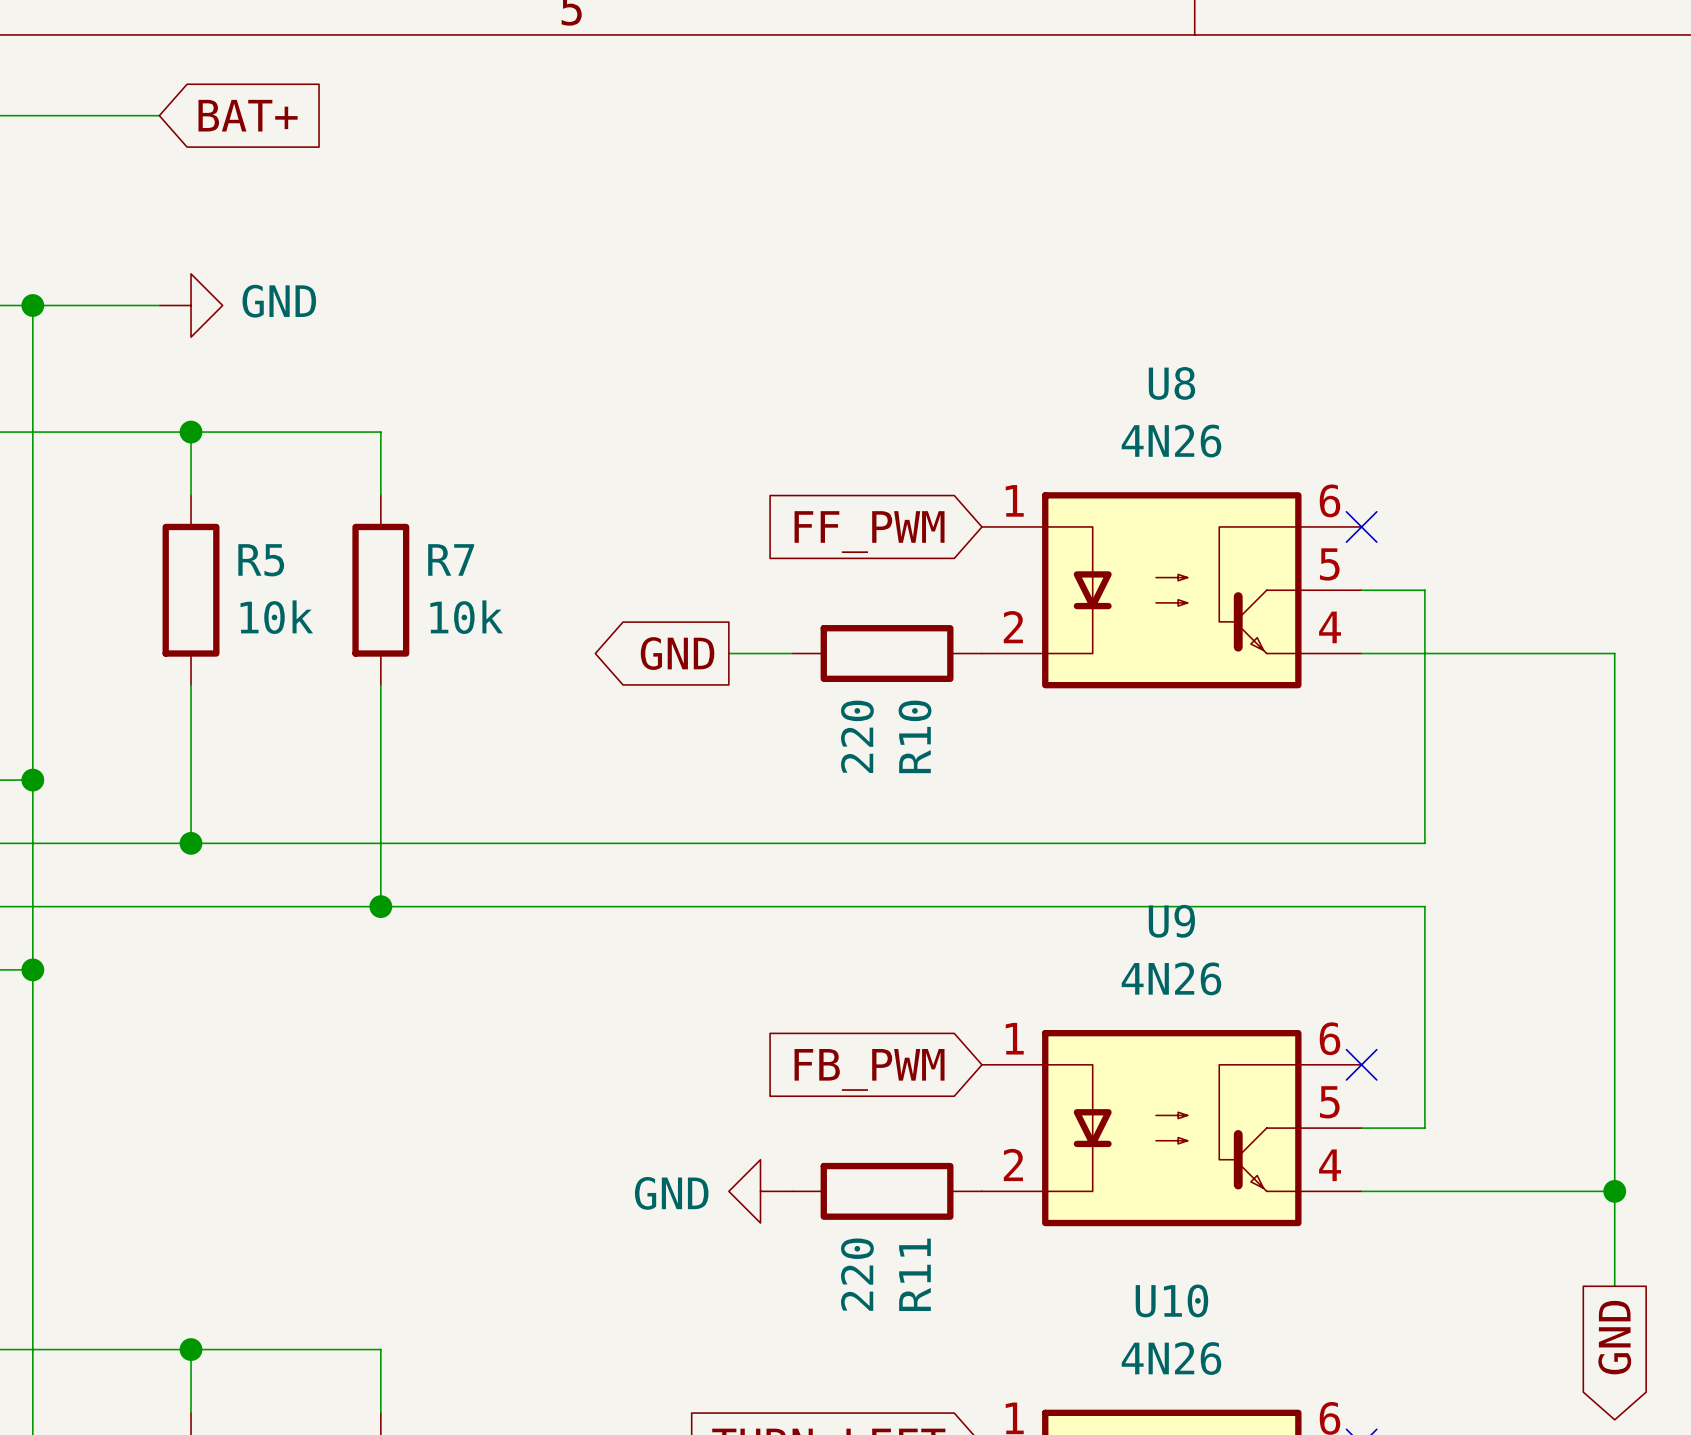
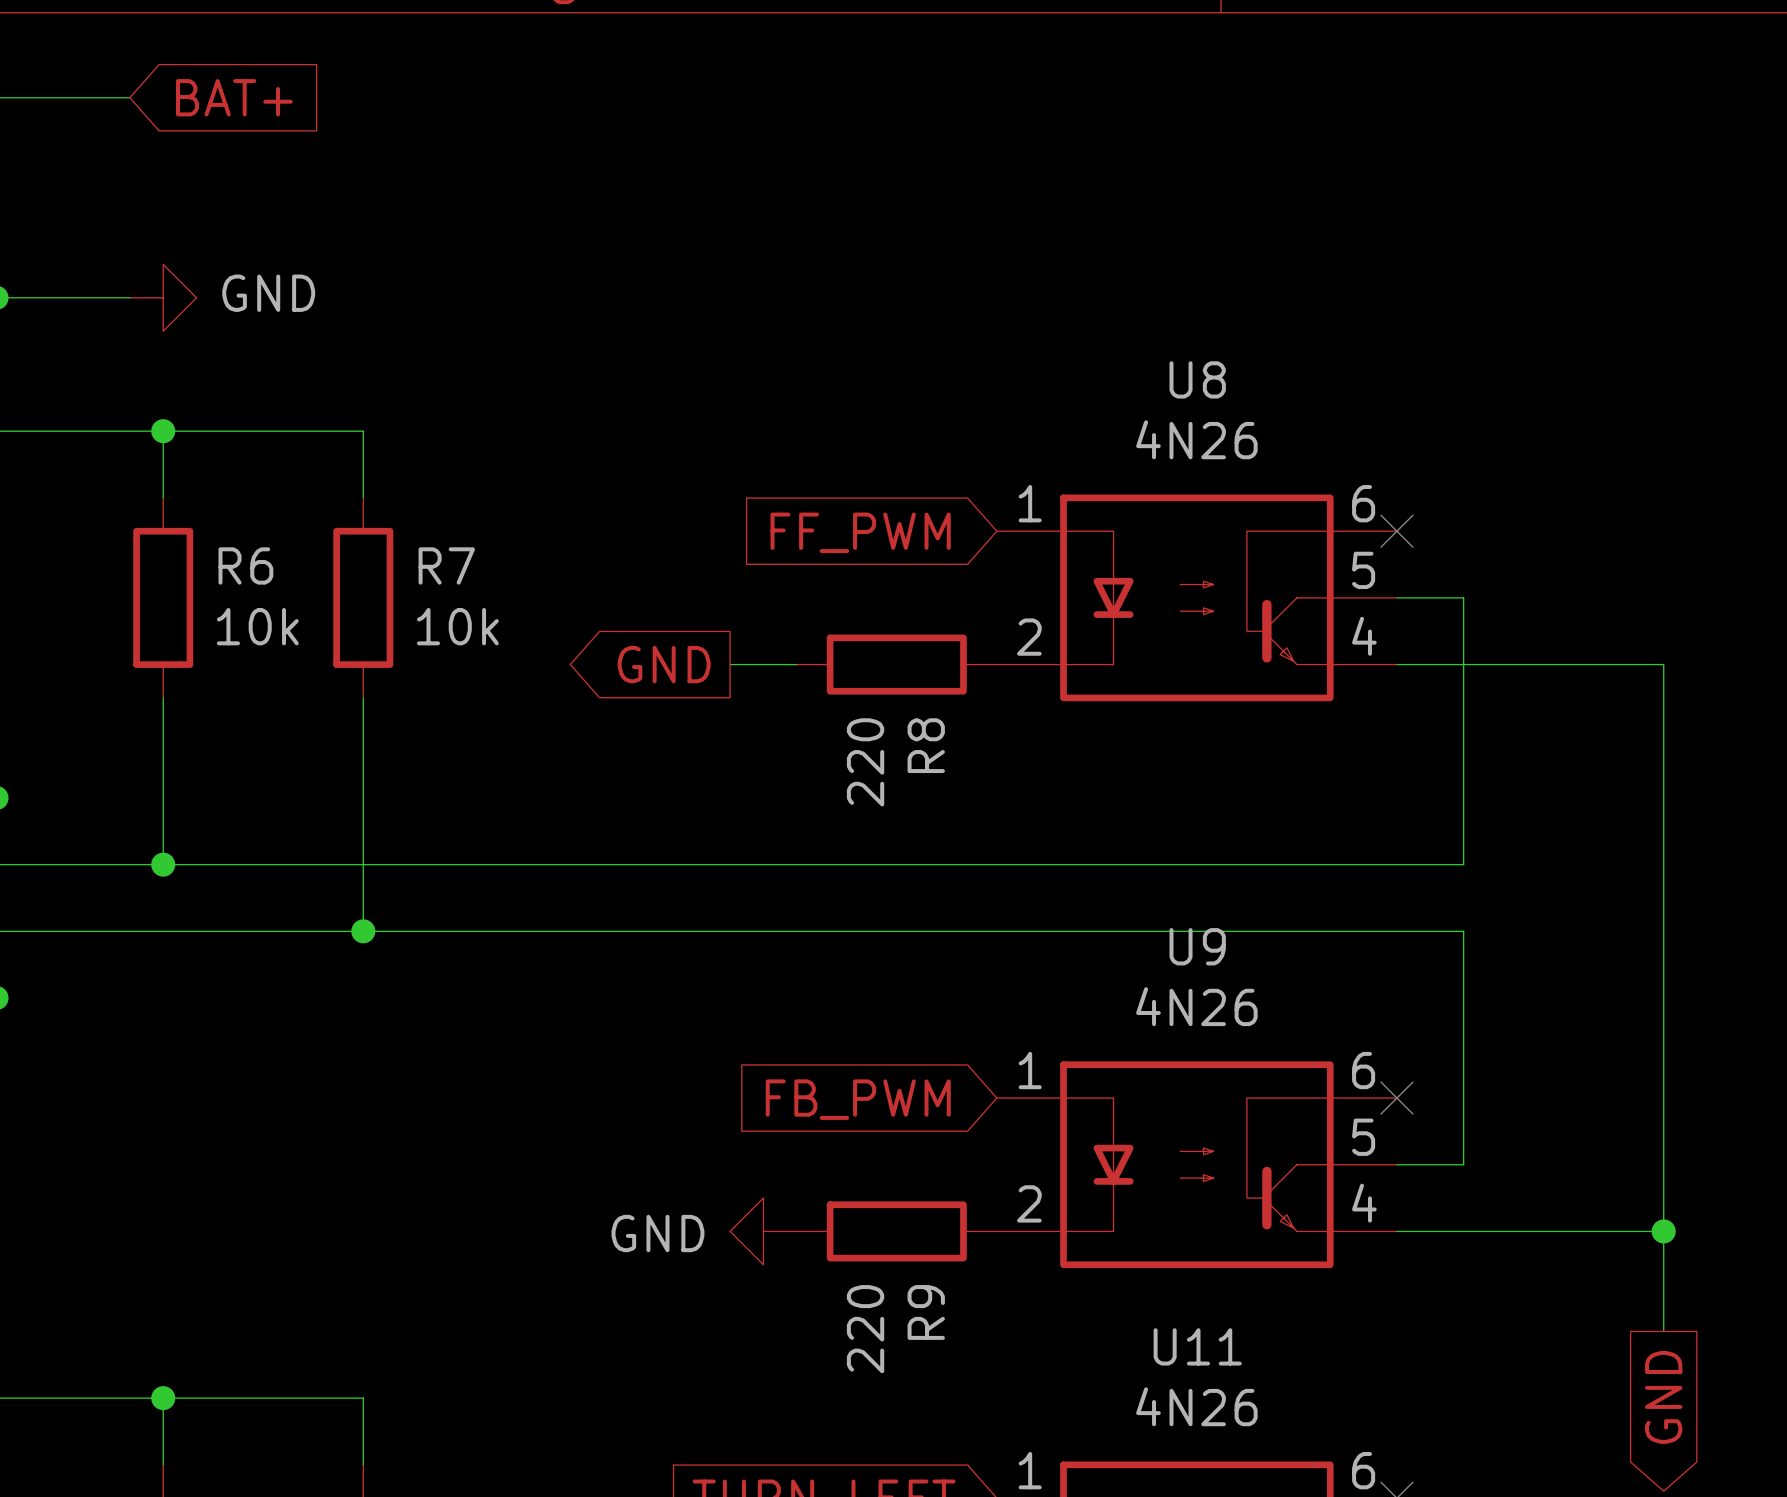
R5 name: R5 (261, 560) -> R6 (245, 565)
R10 name: R10 (915, 736) -> R8 (926, 745)
R11 name: R11 (914, 1274) -> R9 (926, 1312)
U10 name: U10 (1171, 1300) -> U11 (1197, 1346)

